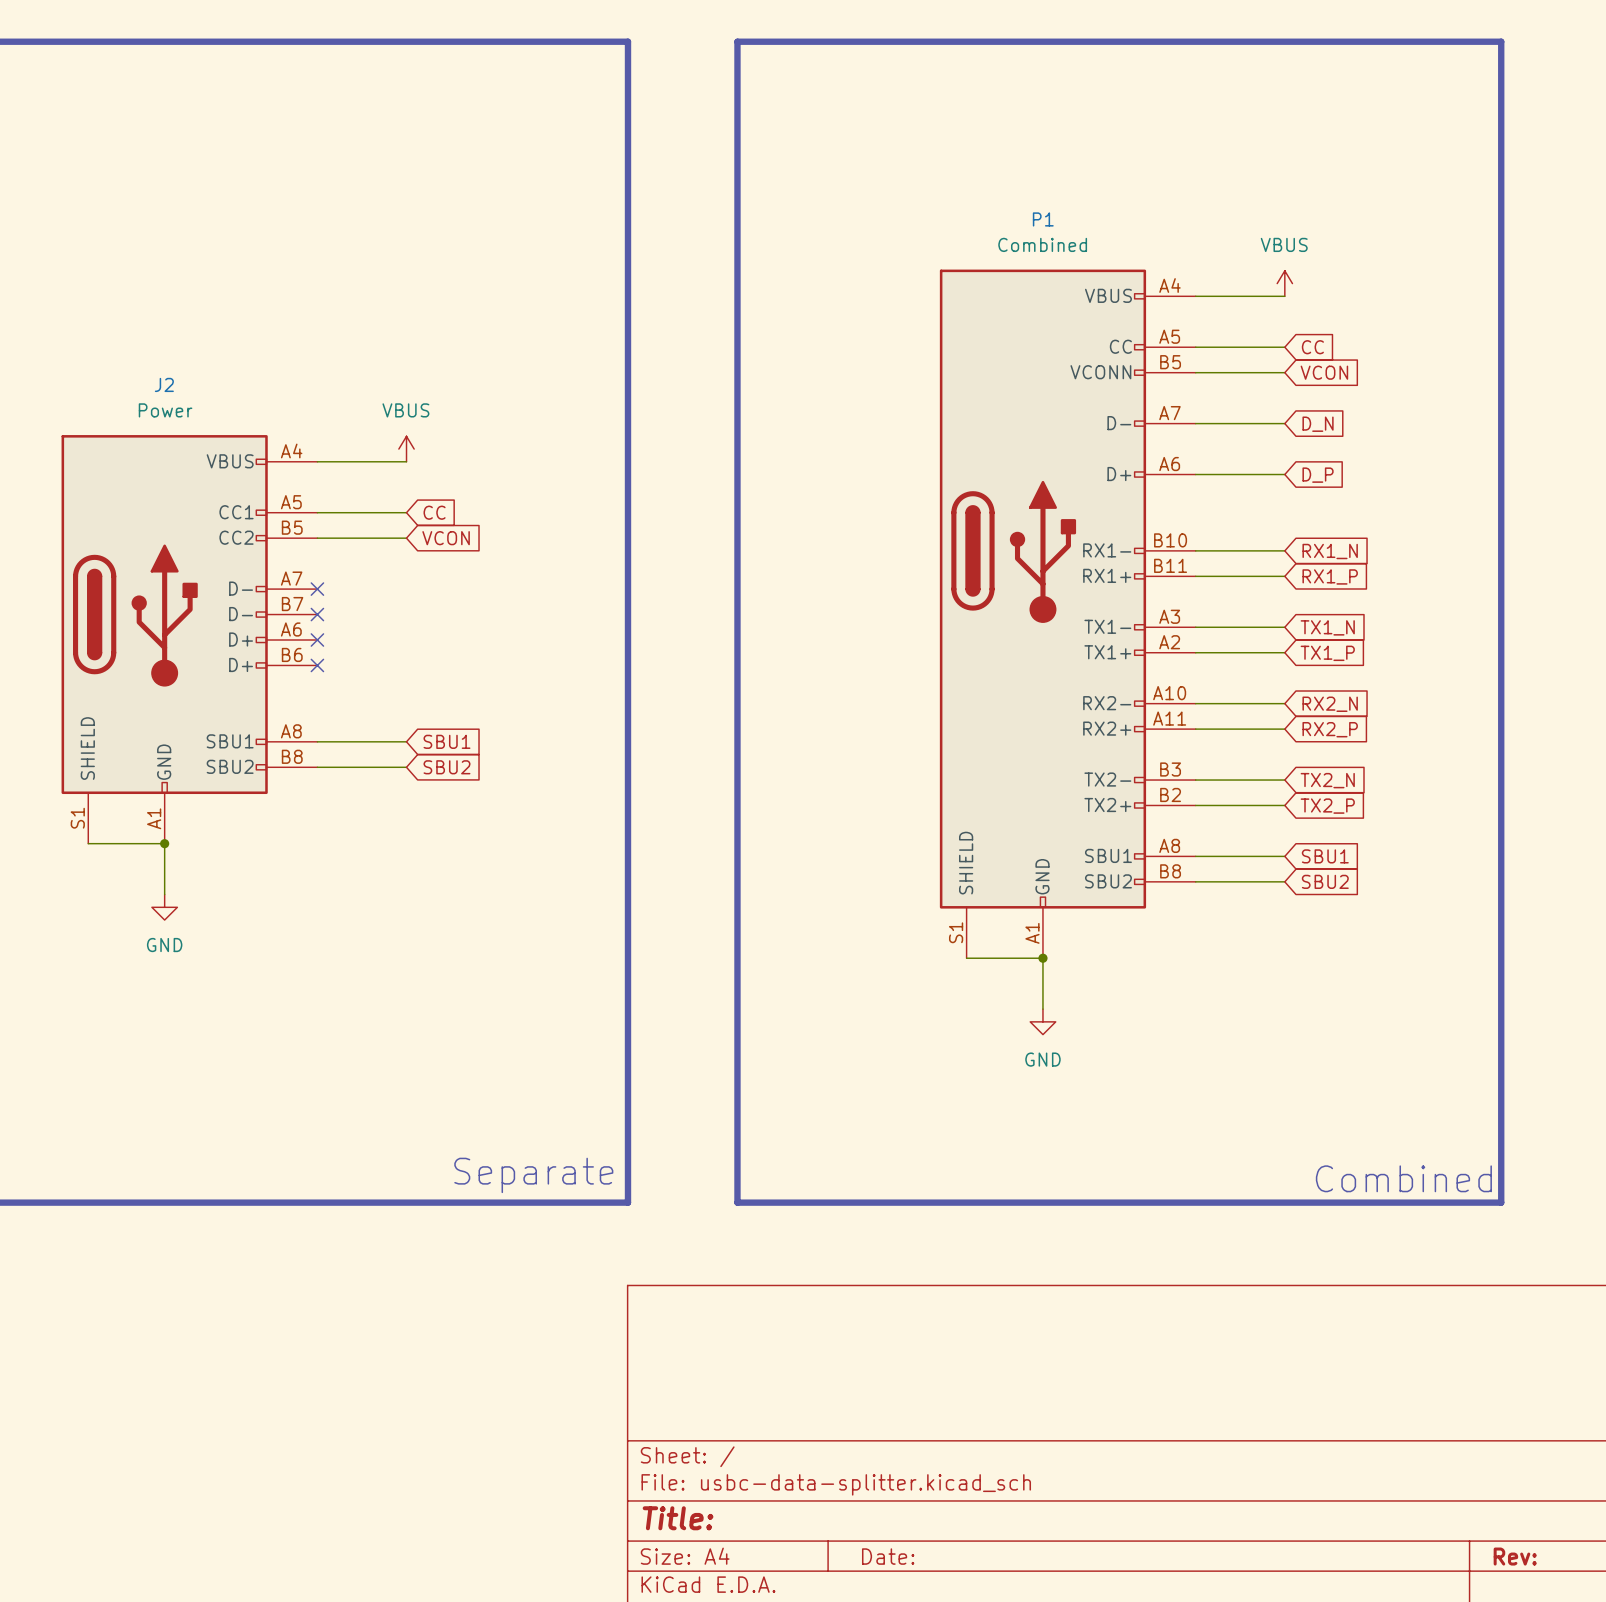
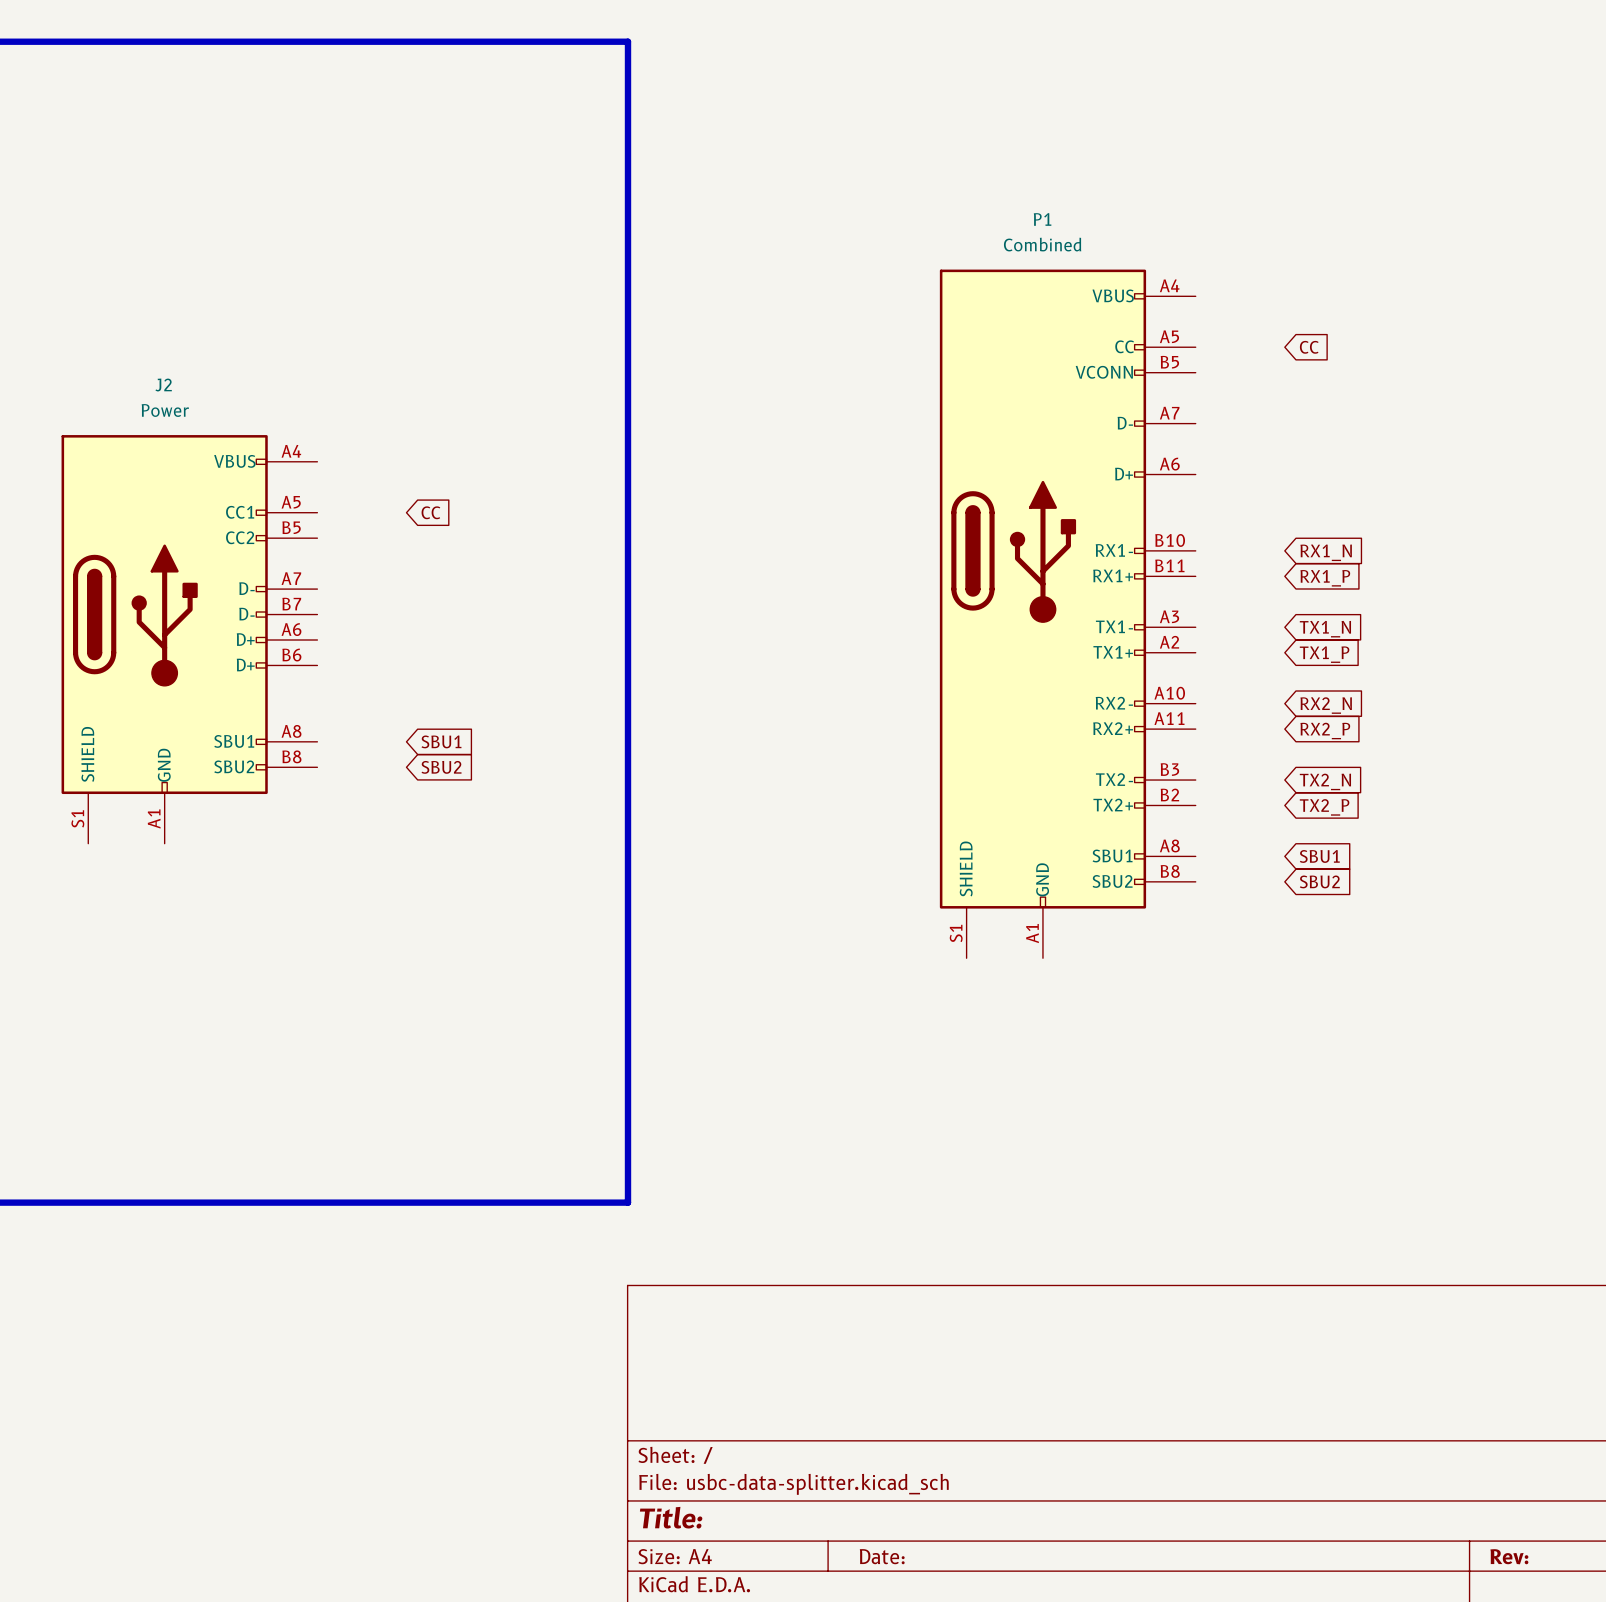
line: (737, 41) (1501, 41) (1501, 1202) (737, 1202) (737, 41) -> none
power symbol: VBUS (1284, 283) -> none
wire: (1195, 296) (1284, 296) -> none
wire: (1195, 347) (1284, 347) -> none
wire: (1195, 372) (1284, 372) -> none
global label: VCON (1324, 372) -> none
wire: (1195, 423) (1284, 423) -> none
global label: D_N (1318, 424) -> none
power symbol: VBUS (406, 449) -> none
wire: (317, 461) (406, 461) -> none
wire: (1195, 474) (1284, 474) -> none
global label: D_P (1318, 475) -> none
wire: (317, 512) (406, 512) -> none
wire: (317, 538) (406, 538) -> none
global label: VCON (446, 538) -> none
wire: (1195, 550) (1284, 550) -> none
wire: (1195, 576) (1284, 576) -> none
no-connect mark: (317, 589) -> none
no-connect mark: (317, 614) -> none
wire: (1195, 627) (1284, 627) -> none
no-connect mark: (317, 640) -> none
wire: (1195, 652) (1284, 652) -> none
no-connect mark: (317, 665) -> none
wire: (1195, 703) (1284, 703) -> none
wire: (1195, 729) (1284, 729) -> none
wire: (317, 741) (406, 741) -> none
wire: (317, 767) (406, 767) -> none
wire: (1195, 780) (1284, 780) -> none
wire: (1195, 805) (1284, 805) -> none
wire: (88, 843) (164, 843) (164, 894) -> none
junction: (164, 843) -> none
wire: (1195, 856) (1284, 856) -> none
wire: (1195, 881) (1284, 881) -> none
power symbol: GND (164, 907) -> none
wire: (966, 958) (1042, 958) (1042, 1009) -> none
junction: (1042, 958) -> none
power symbol: GND (1042, 1021) -> none
text: Separate (533, 1175) -> none
text: Combined (1403, 1178) -> none

